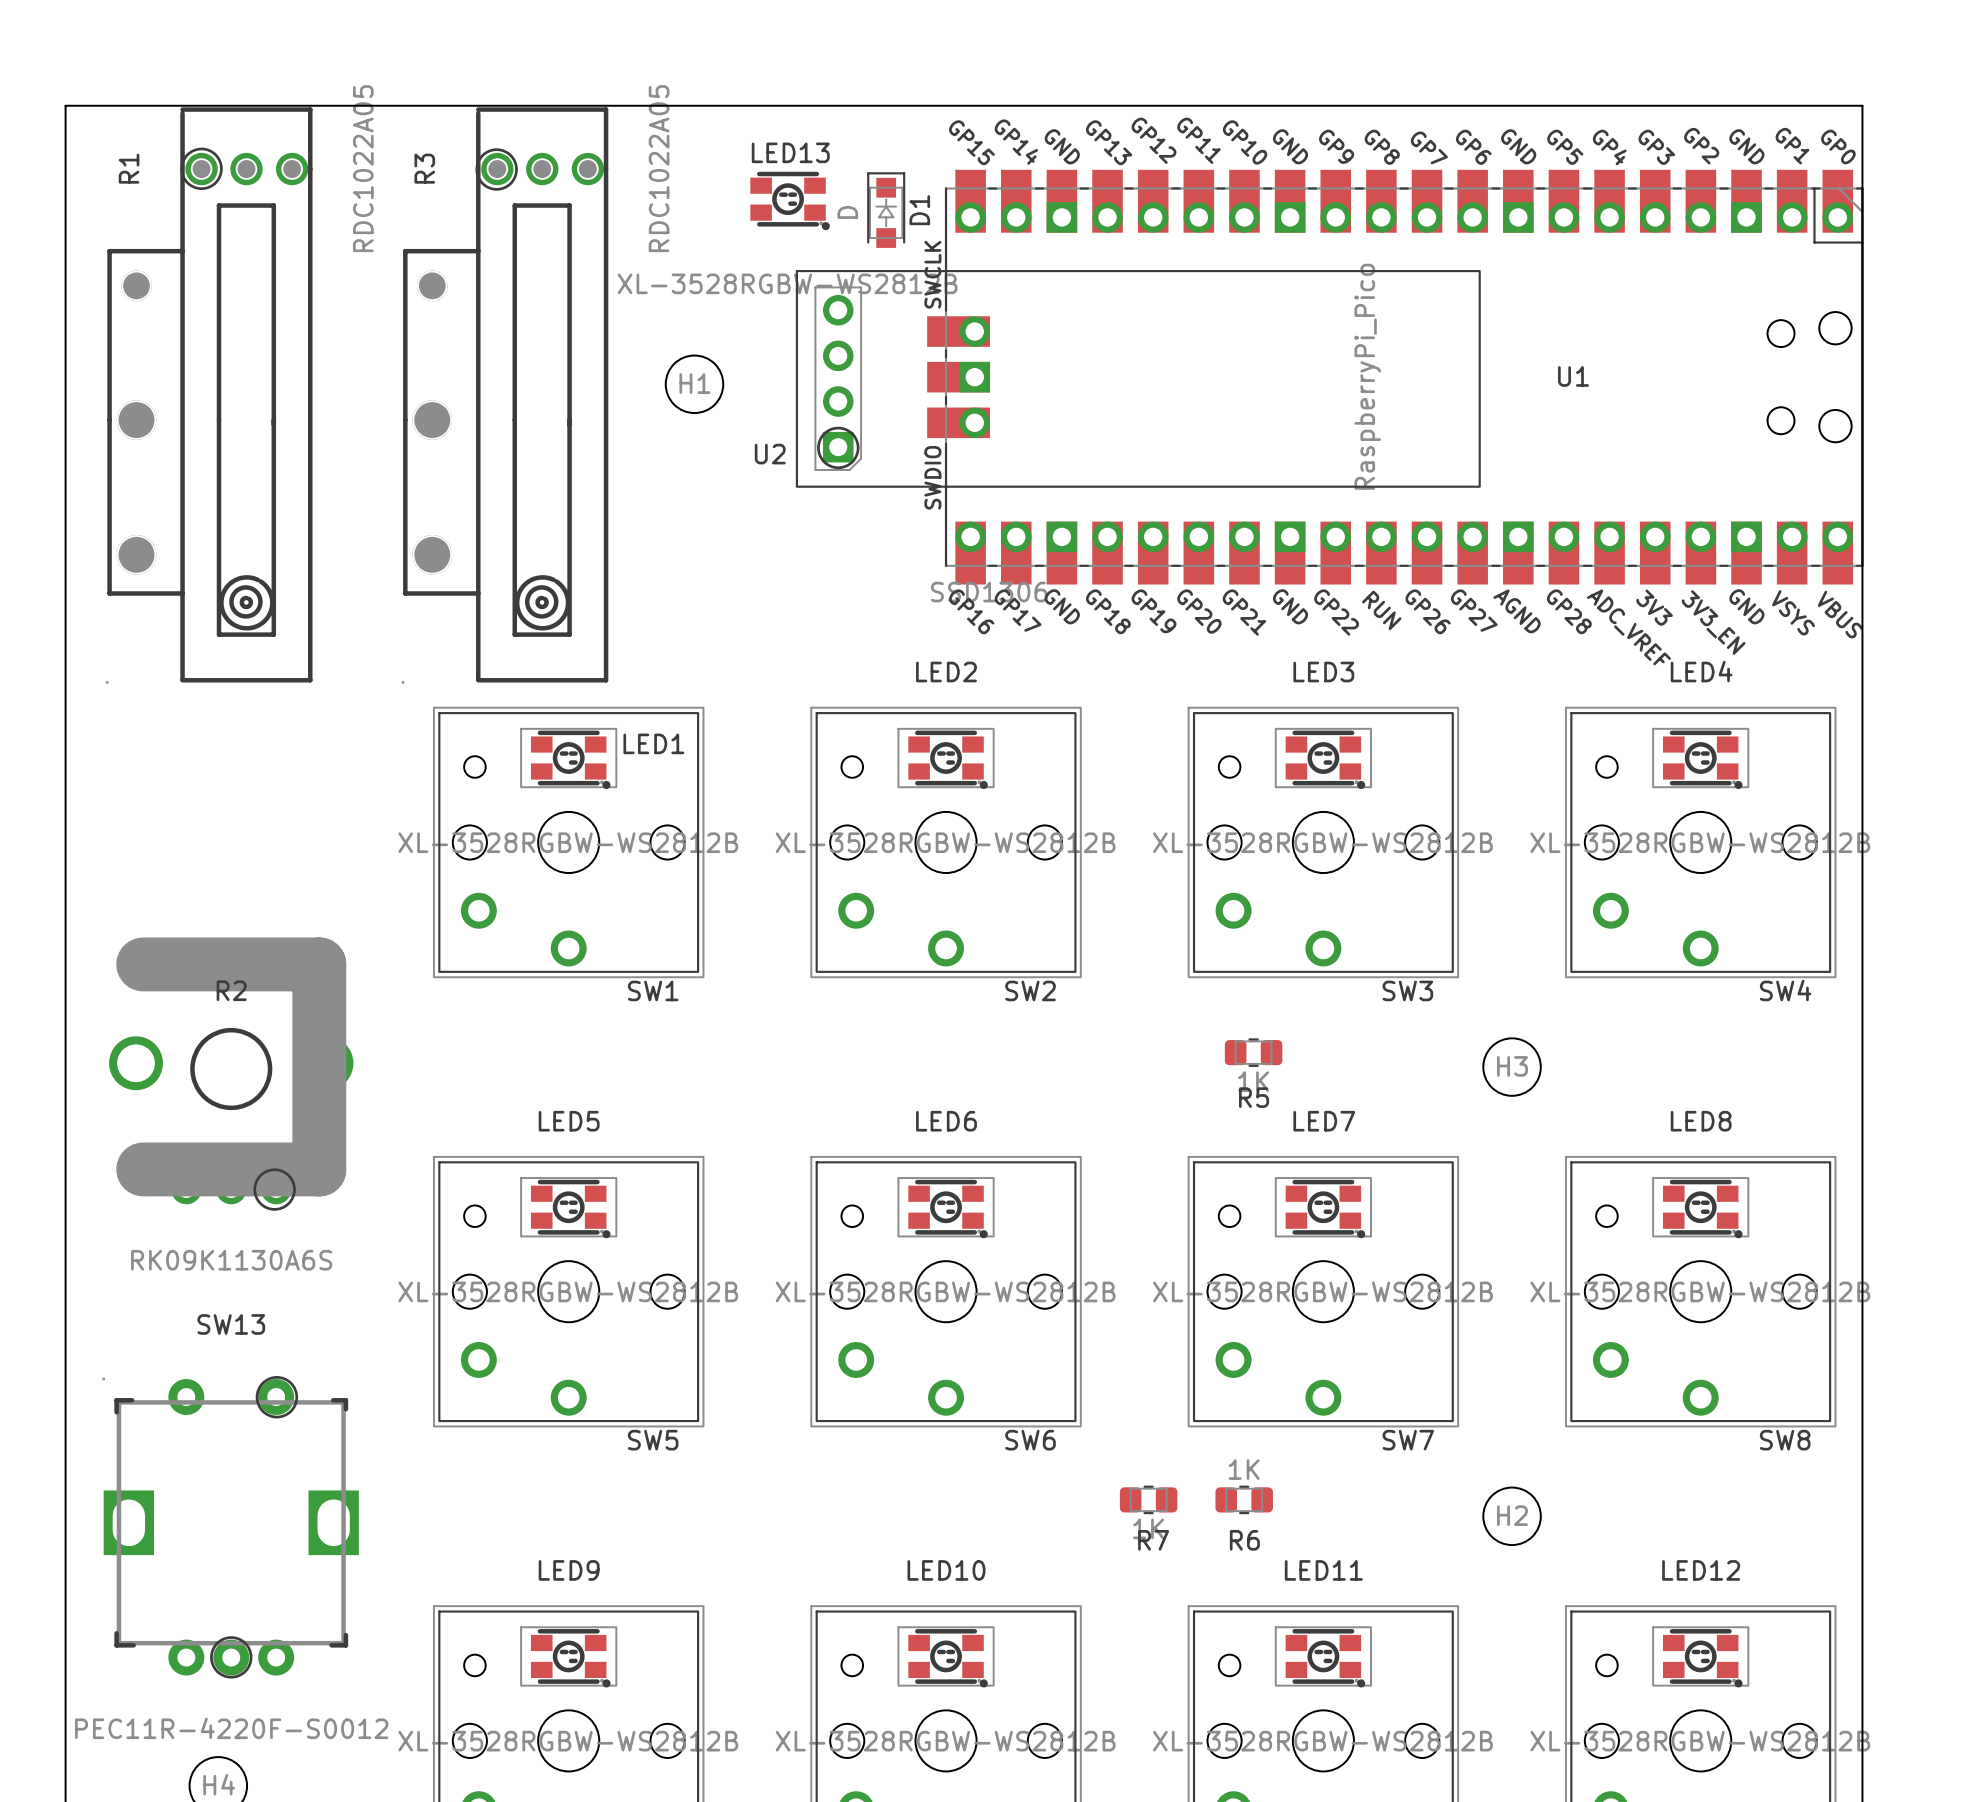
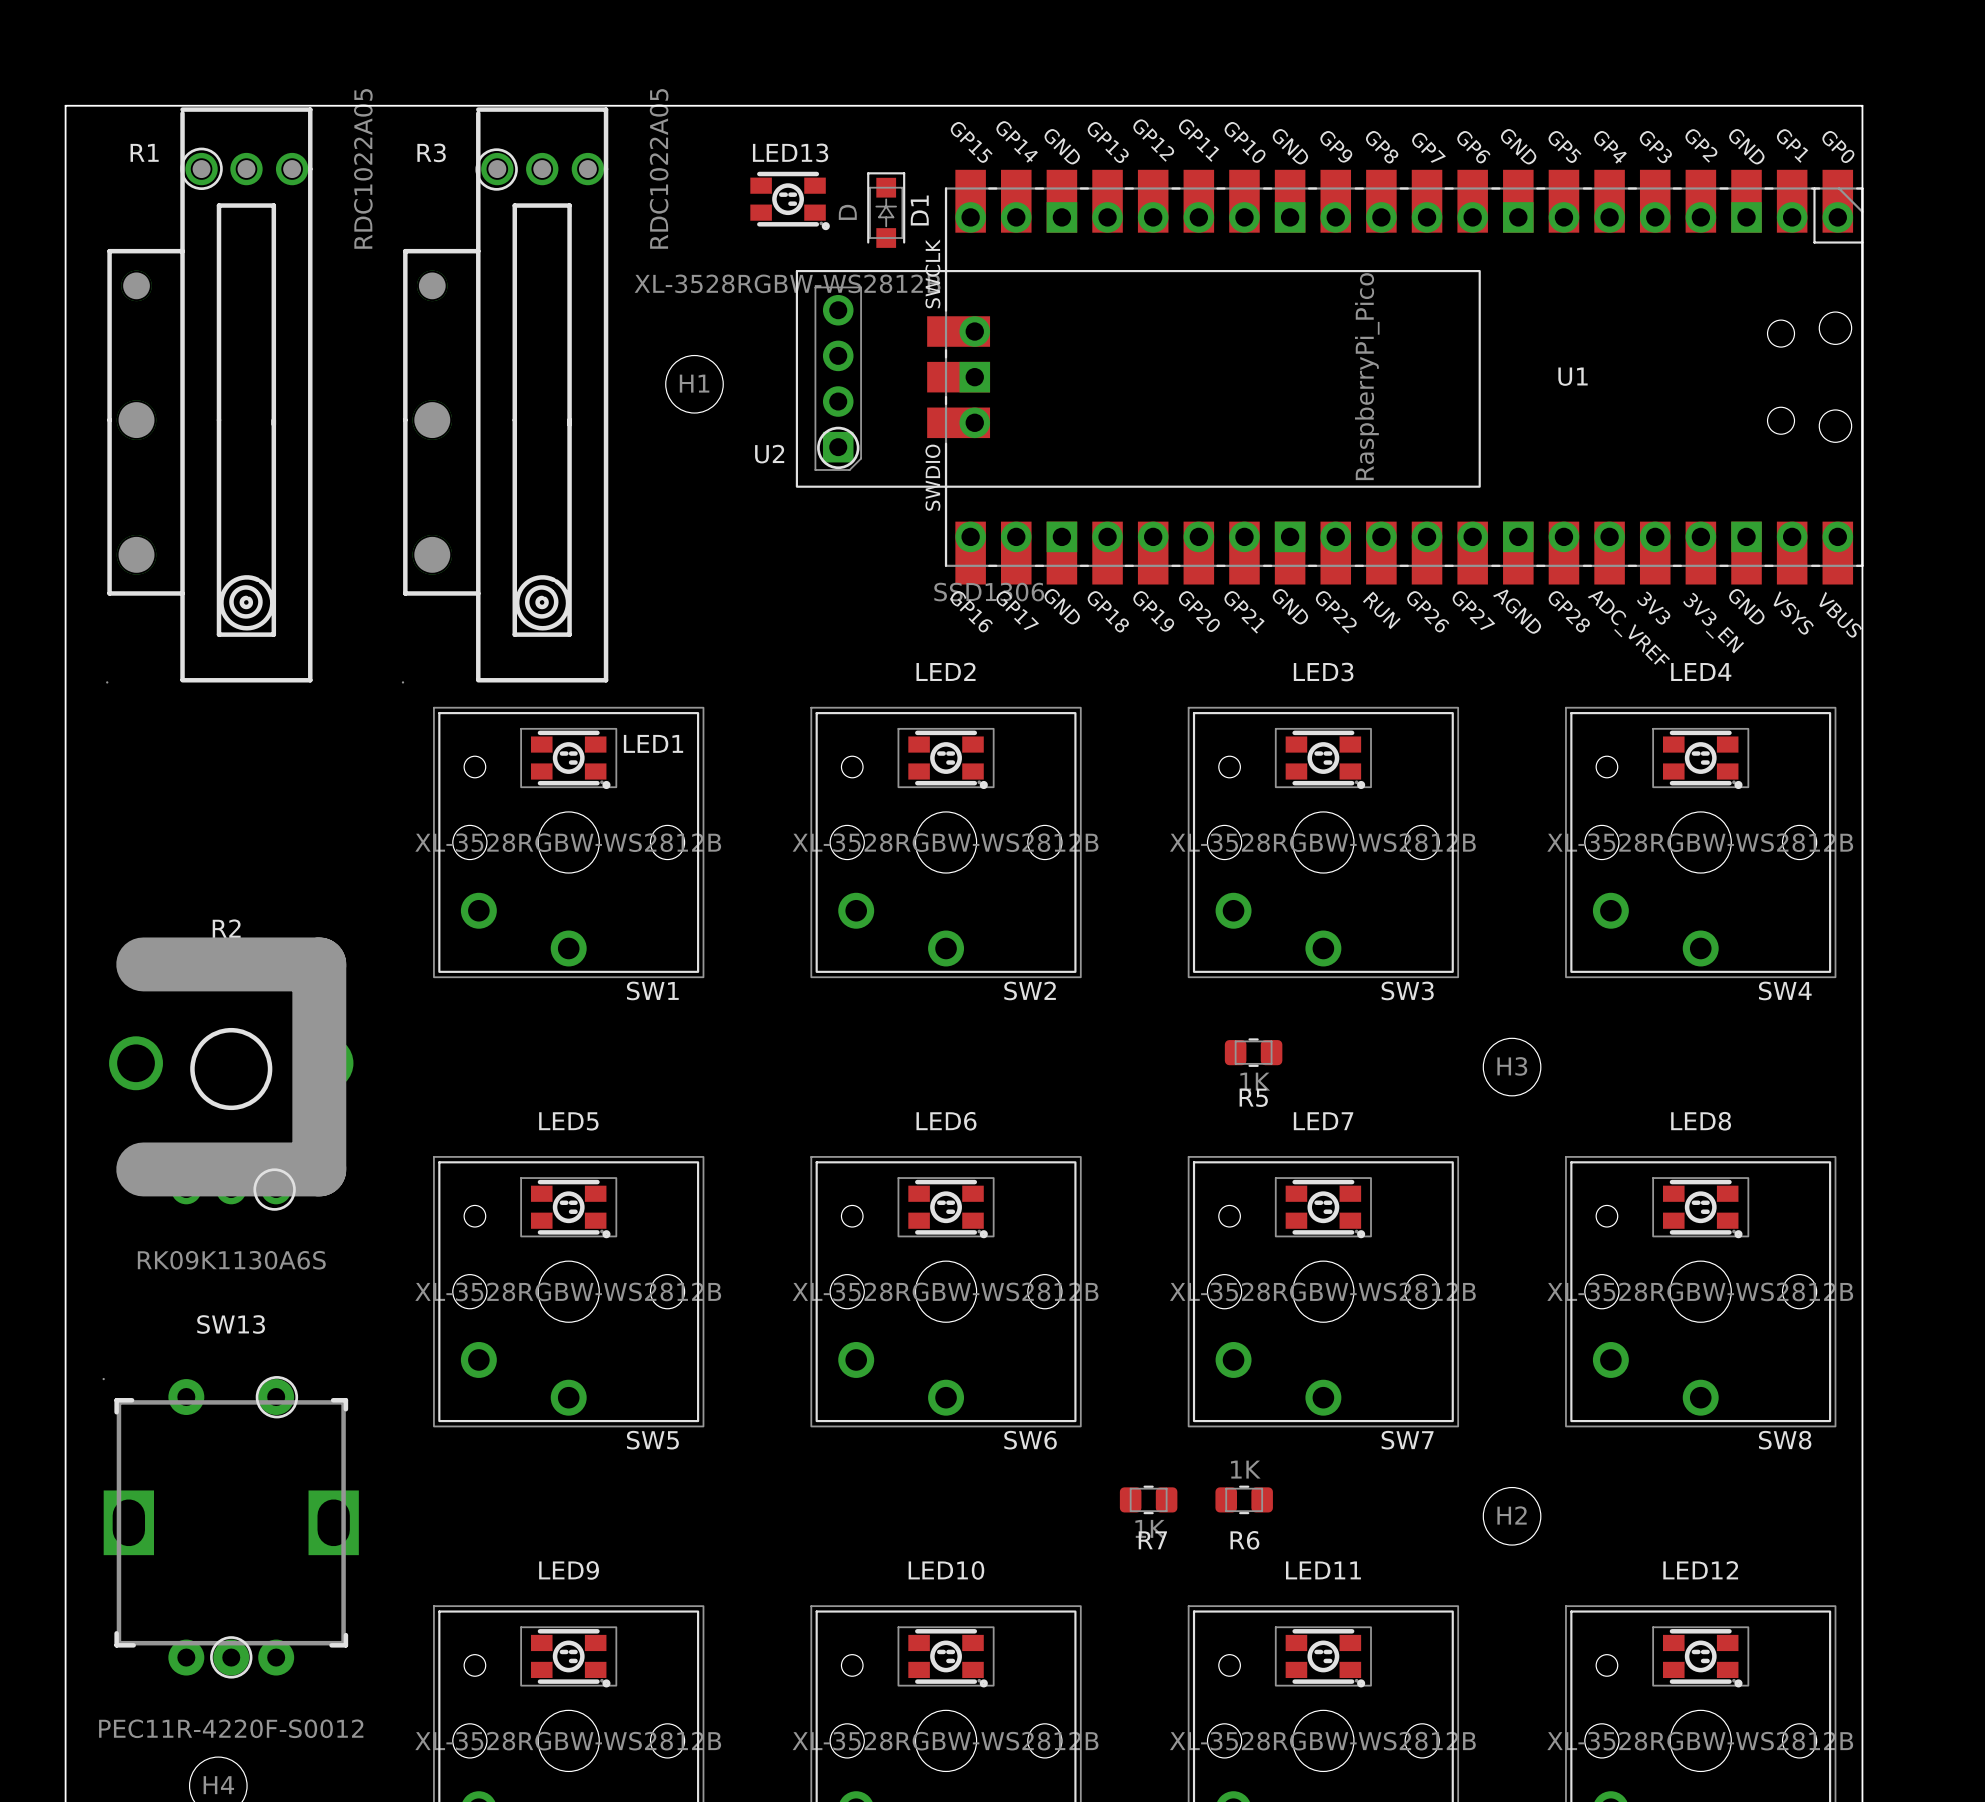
R1 name rotation: 0° (129, 168) -> 90° clockwise (144, 152)
R3 name rotation: 0° (424, 168) -> 90° clockwise (431, 152)
R2 name position: R2 (231, 990) -> R2 (226, 928)

